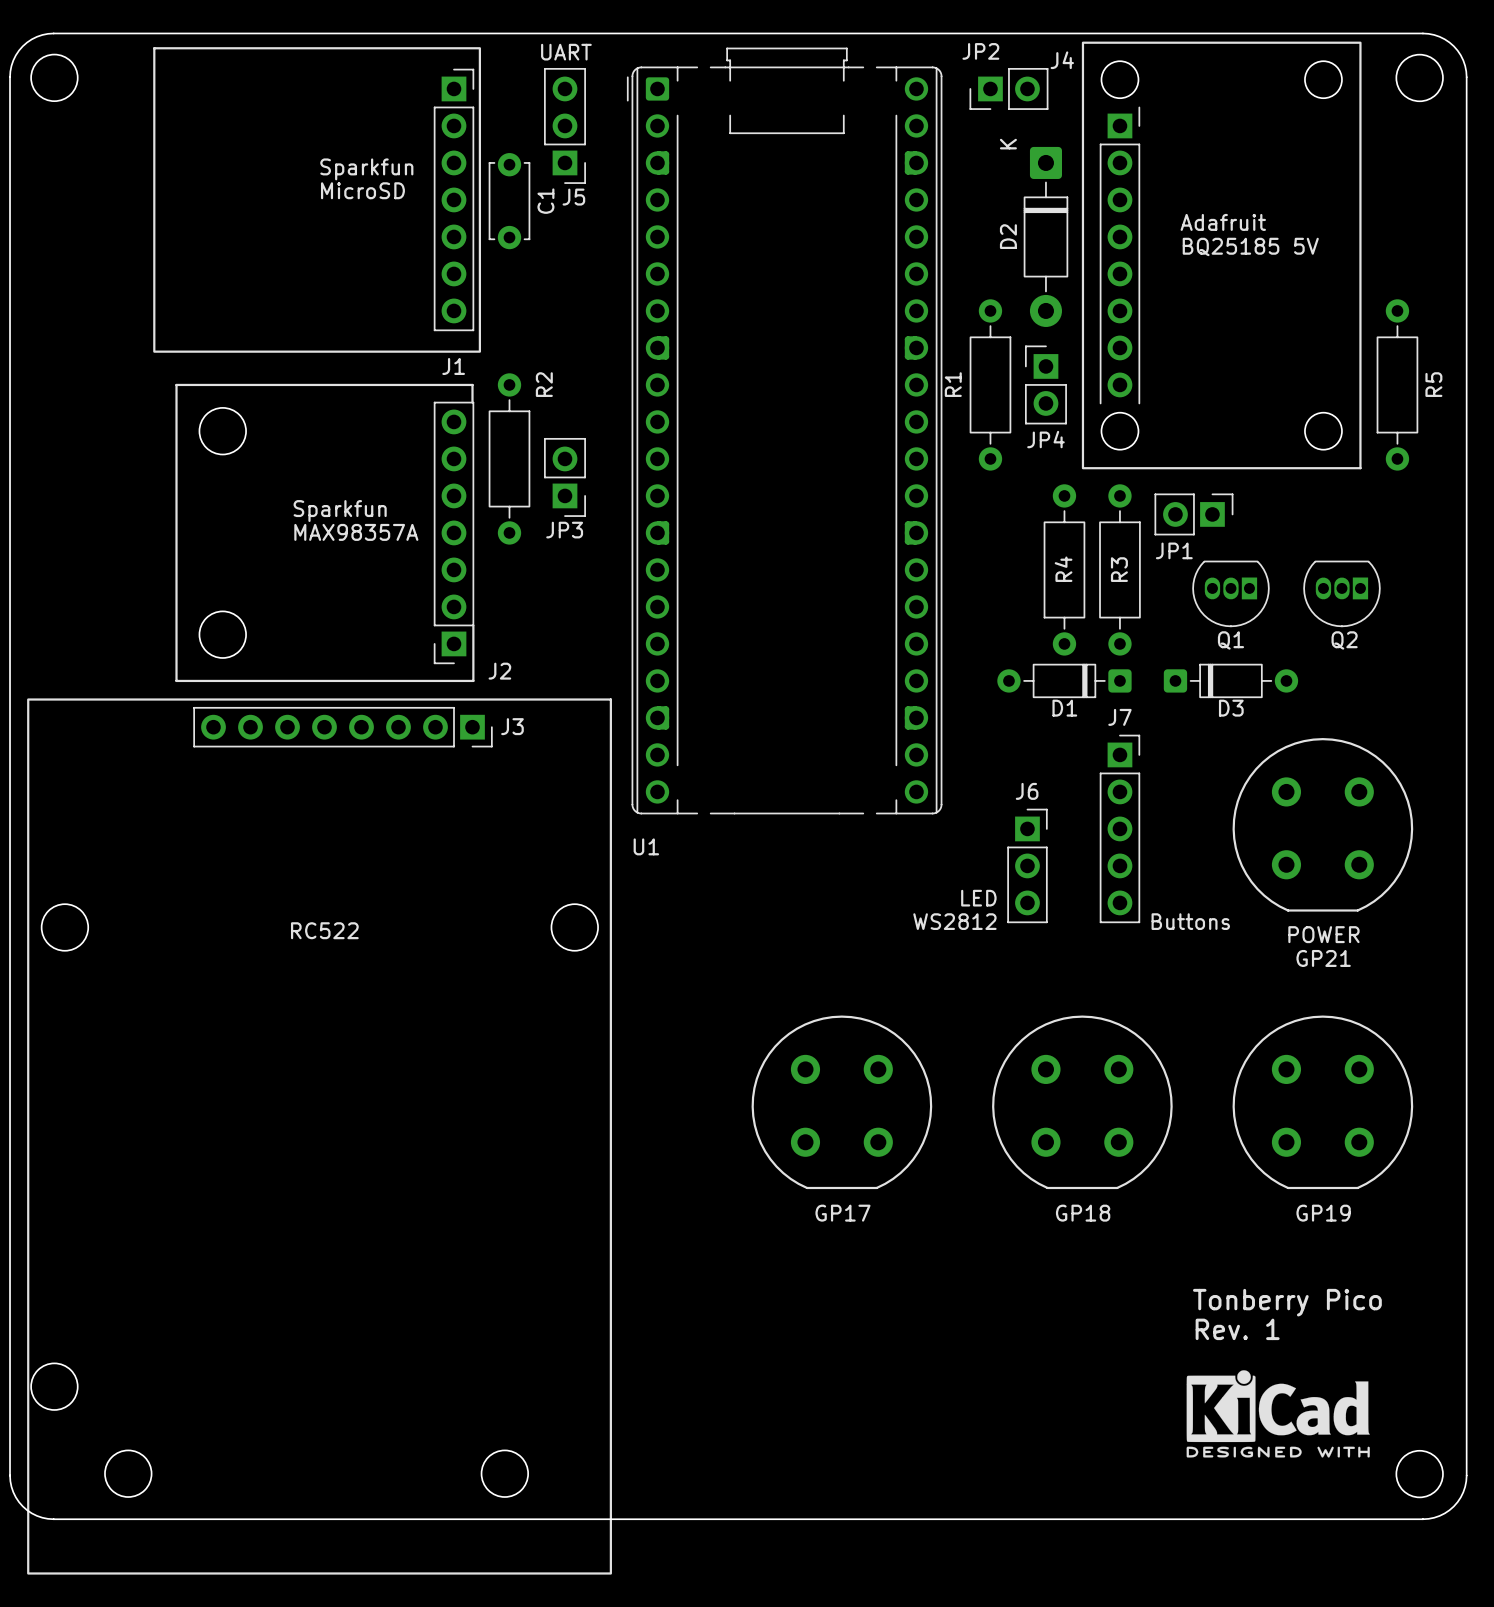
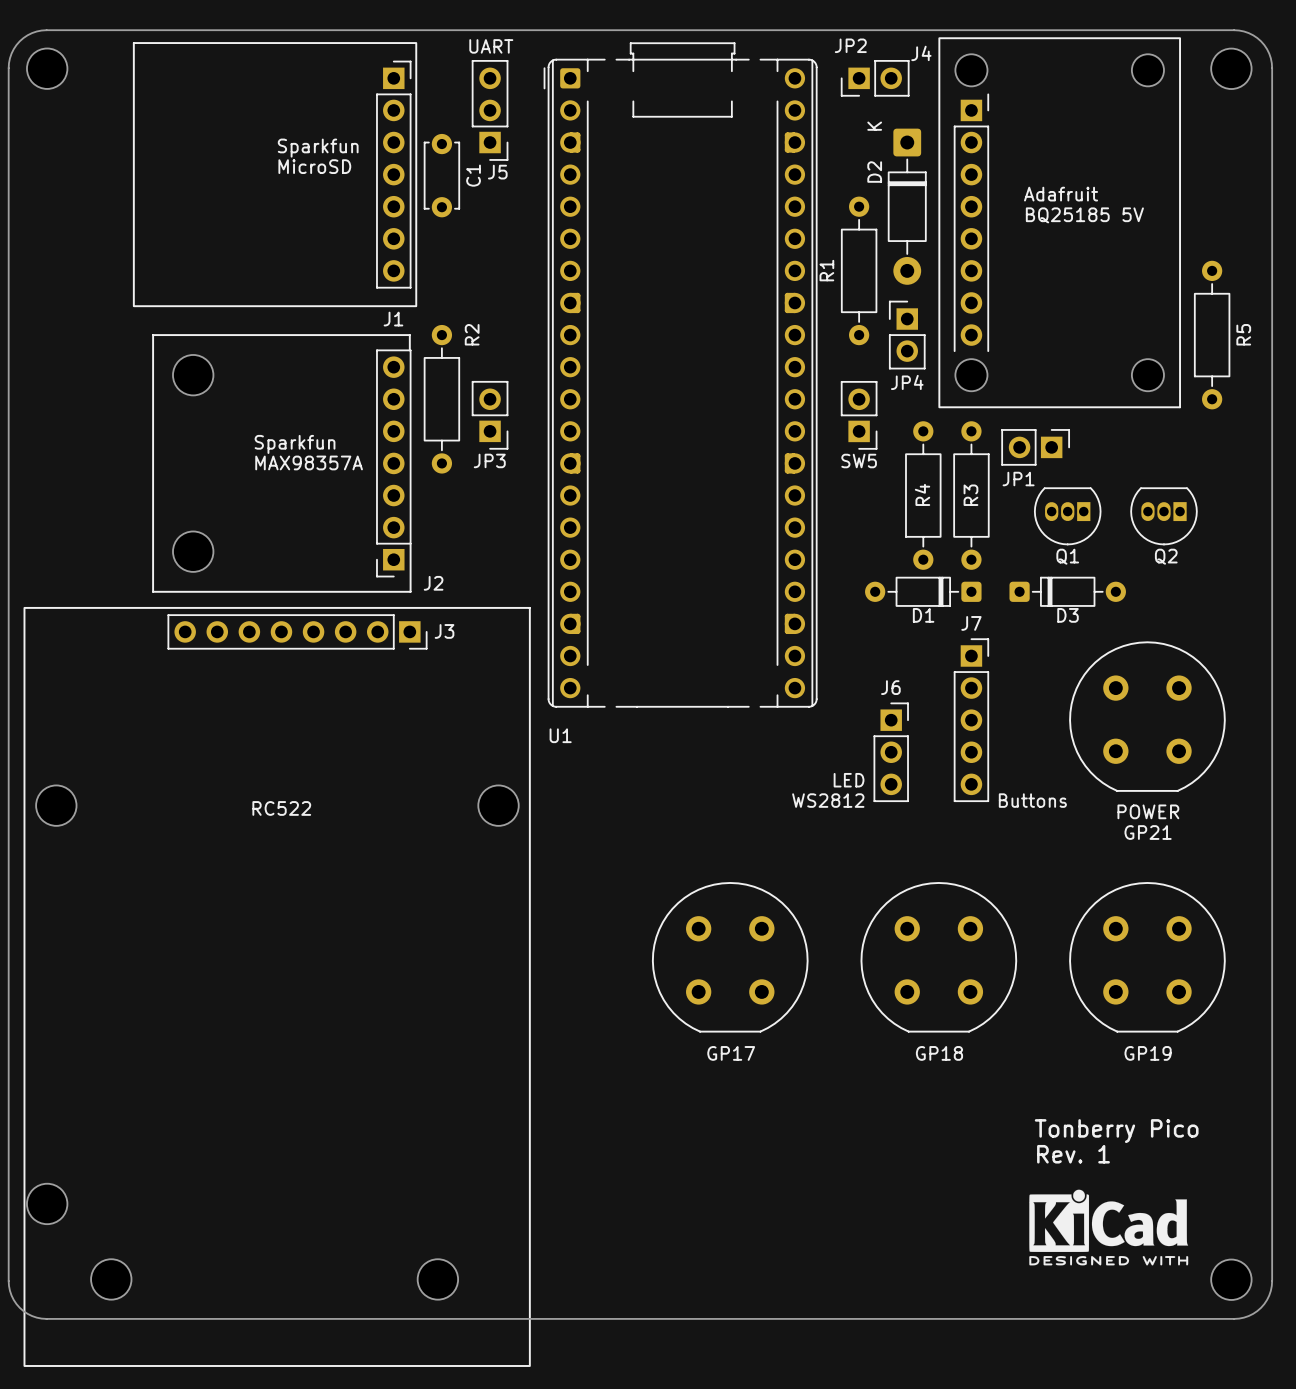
D2 name position: D2 (1008, 236) -> D2 (874, 172)
R1 position: (990, 384) -> (859, 270)
SW5: none -> (859, 415)

